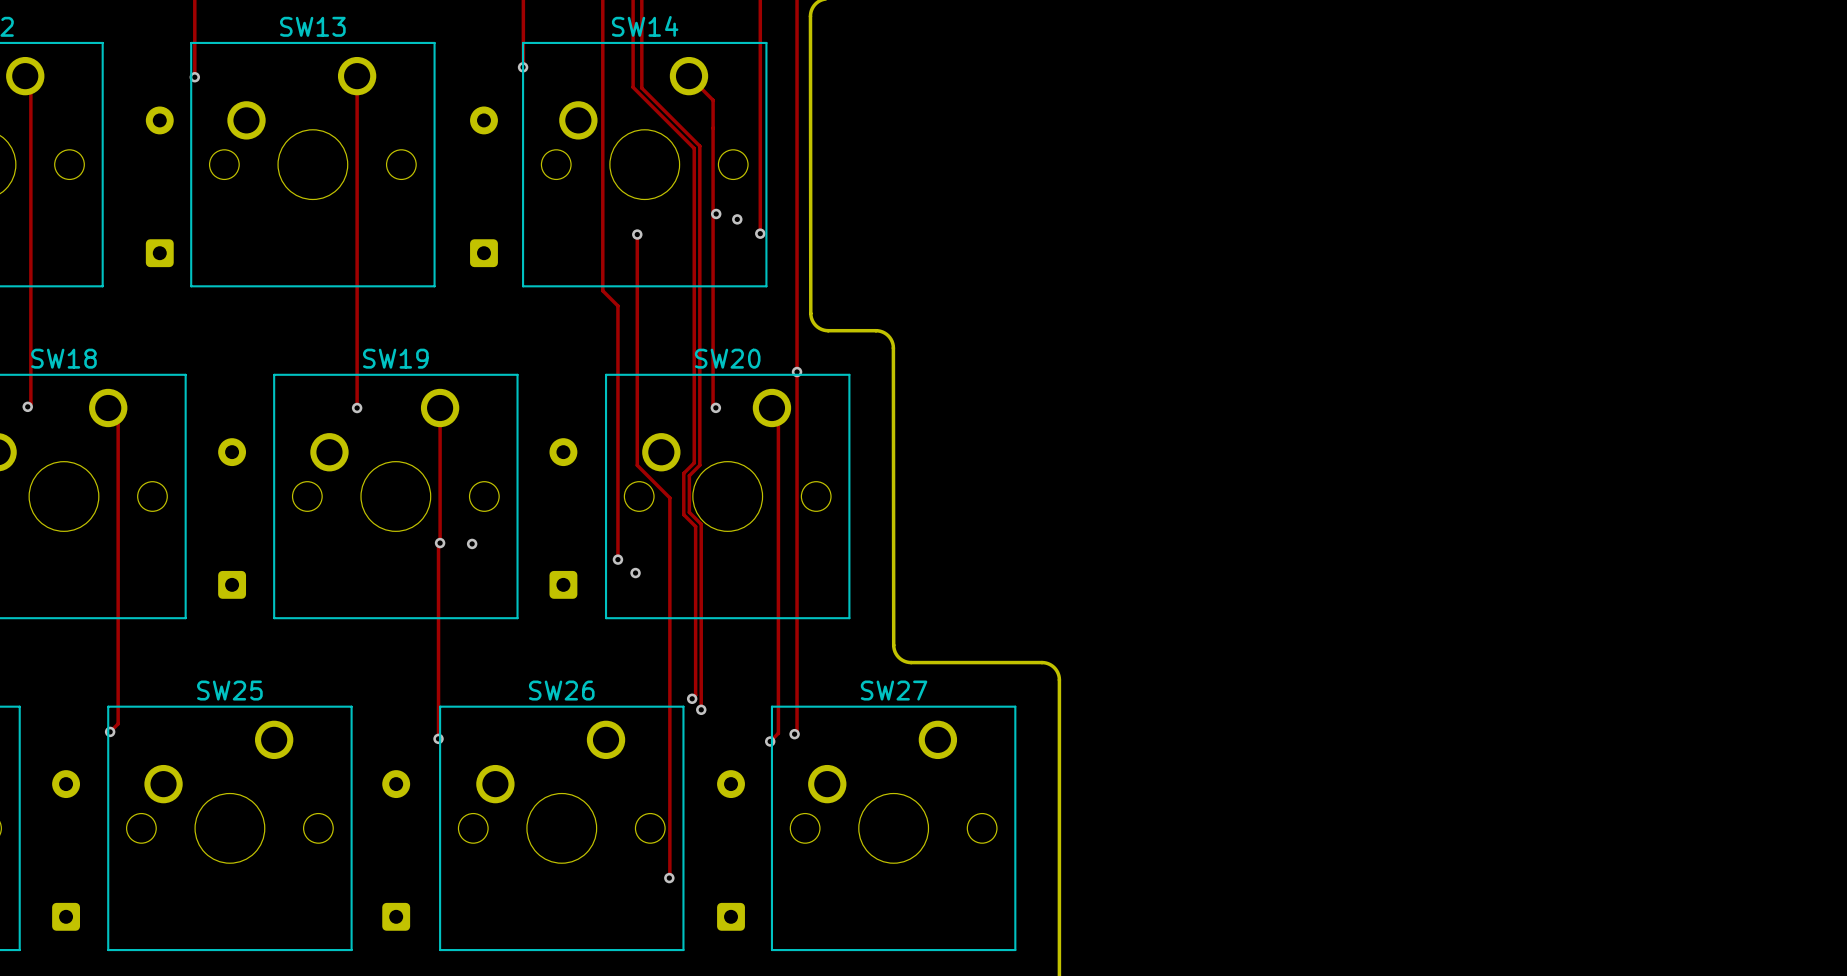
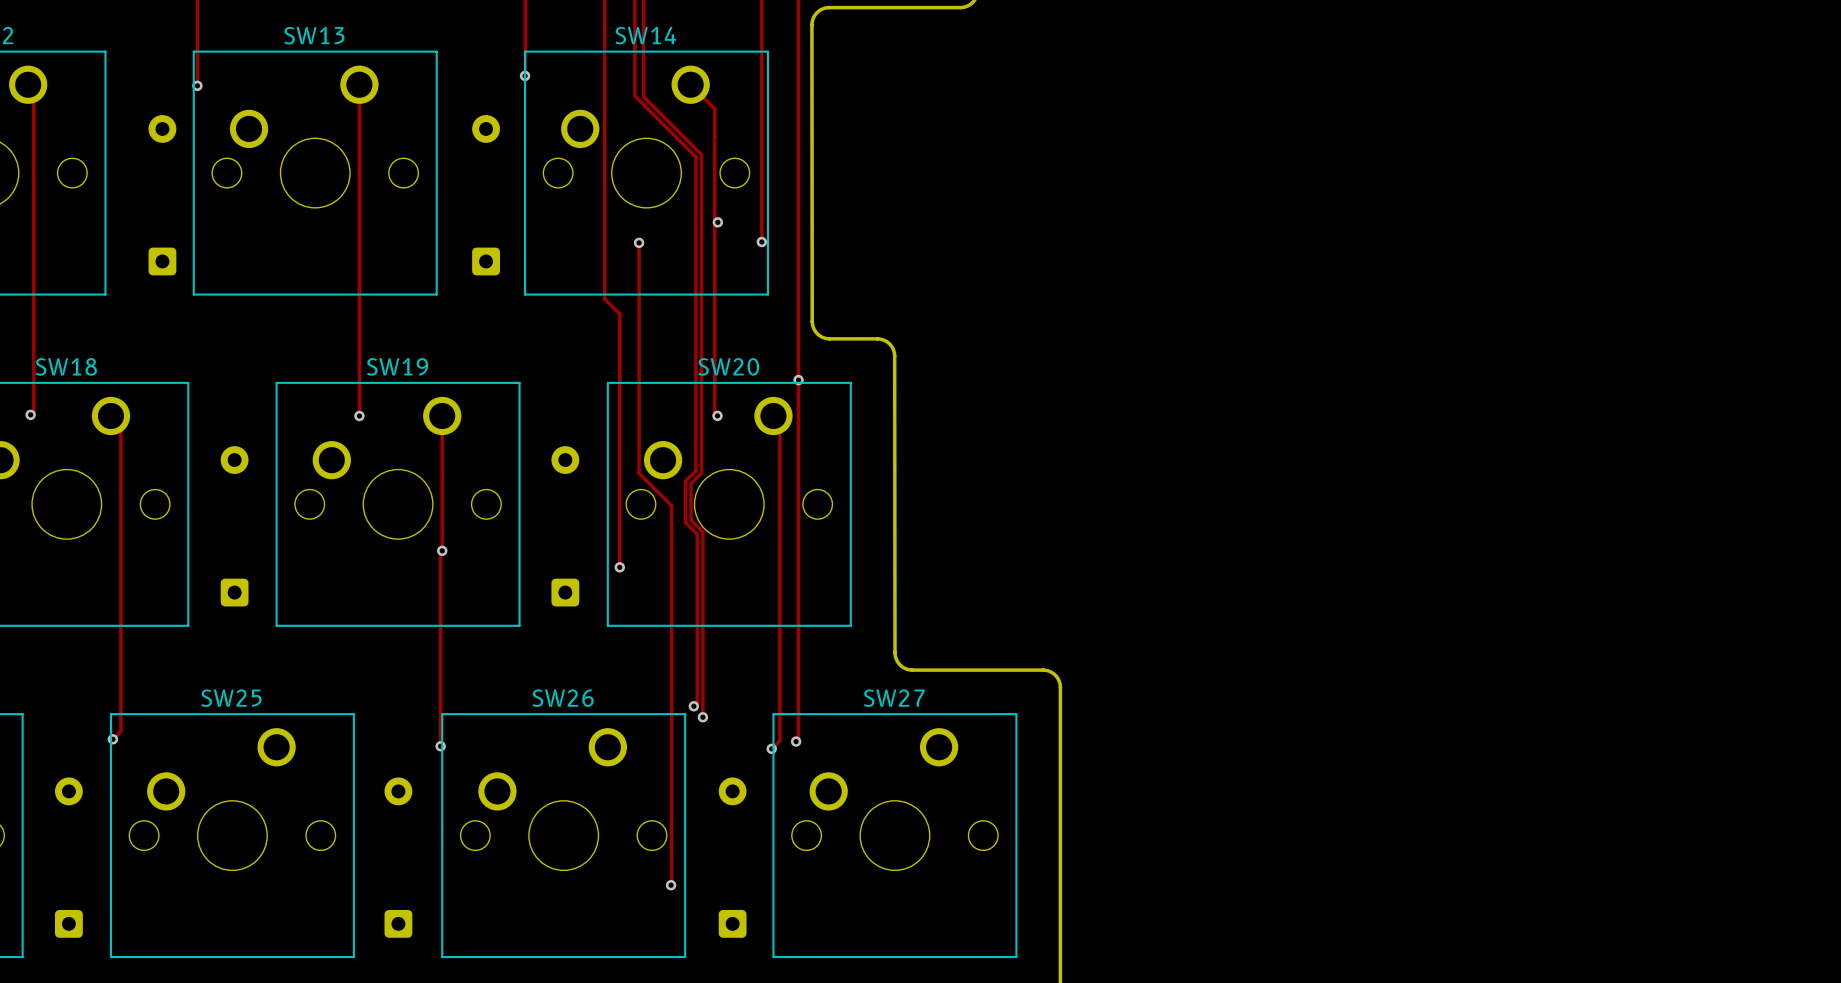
via: (737, 219) -> none
via: (472, 543) -> none
via: (635, 573) -> none

